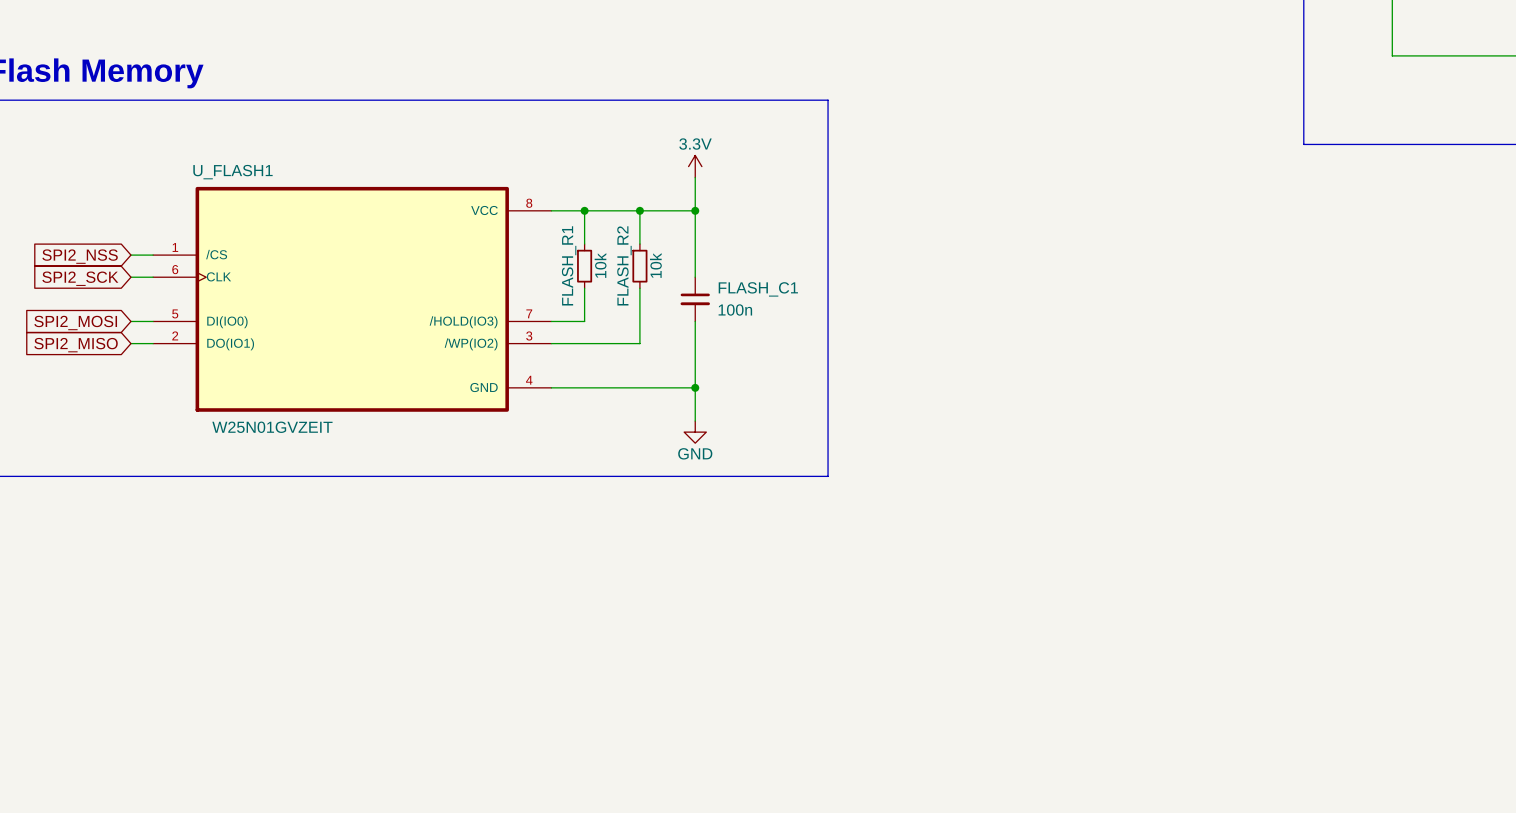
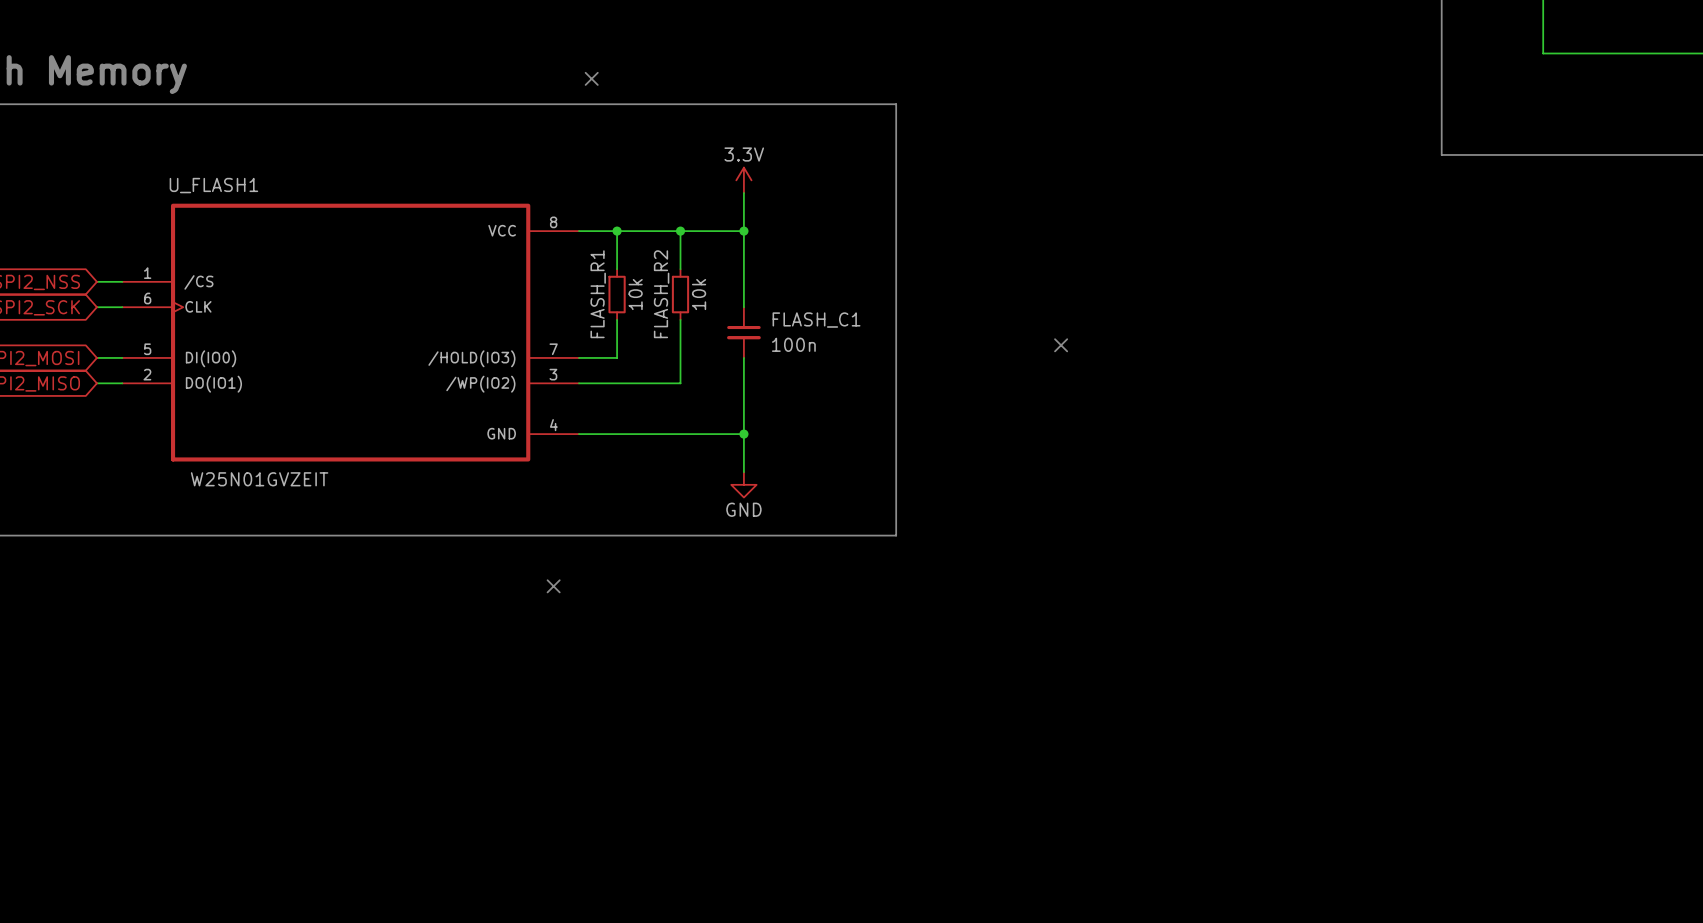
no-connect mark: none -> (591, 78)
no-connect mark: none -> (1061, 345)
no-connect mark: none -> (553, 586)

